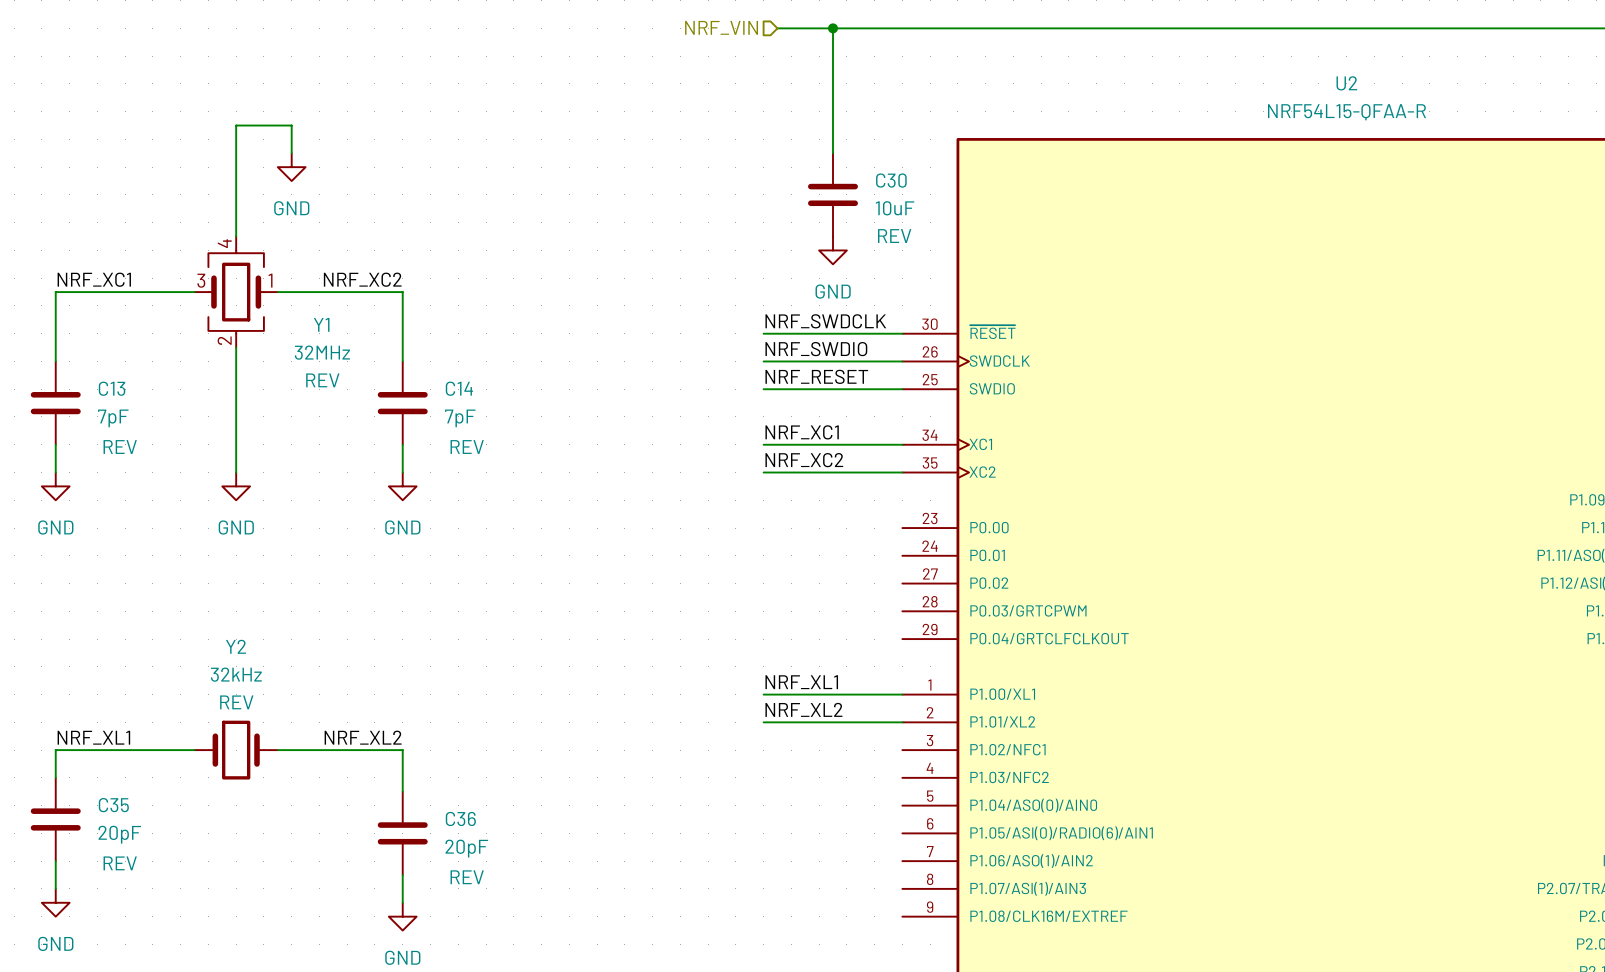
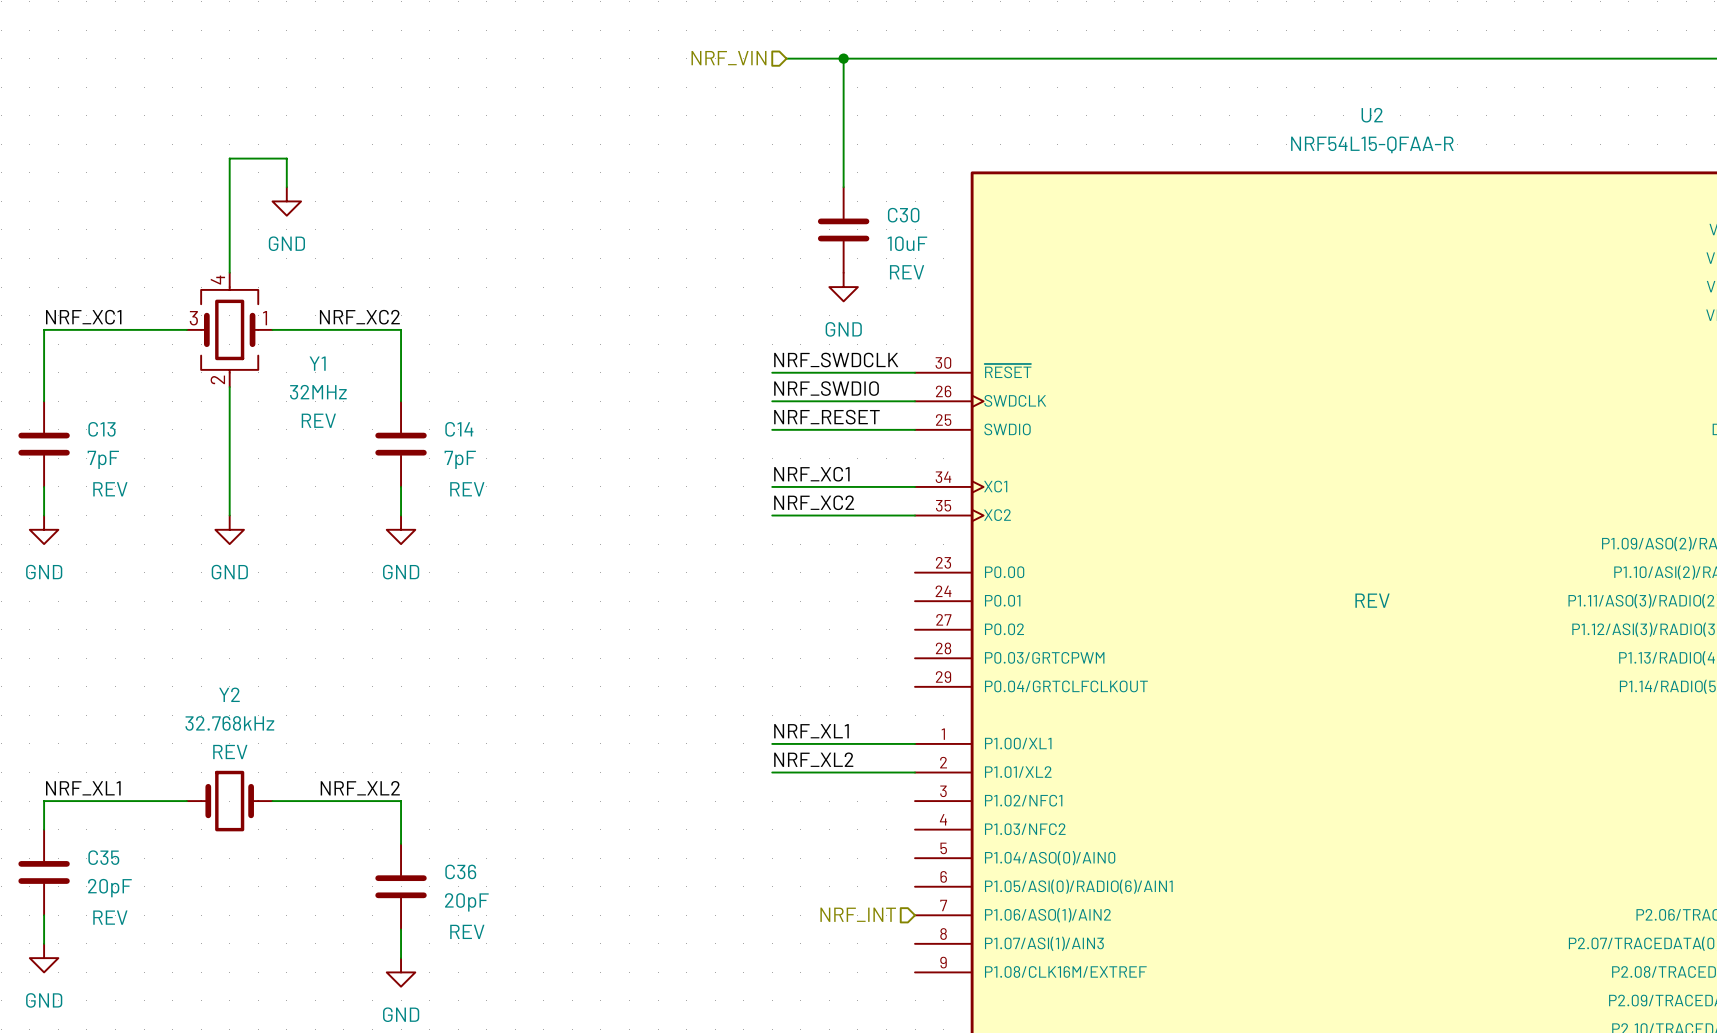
U2 text: none -> REV (1372, 600)
Y2 value: 32kHz (236, 674) -> 32.768kHz (229, 723)
hierarchical label: none -> NRF_INT (858, 914)

